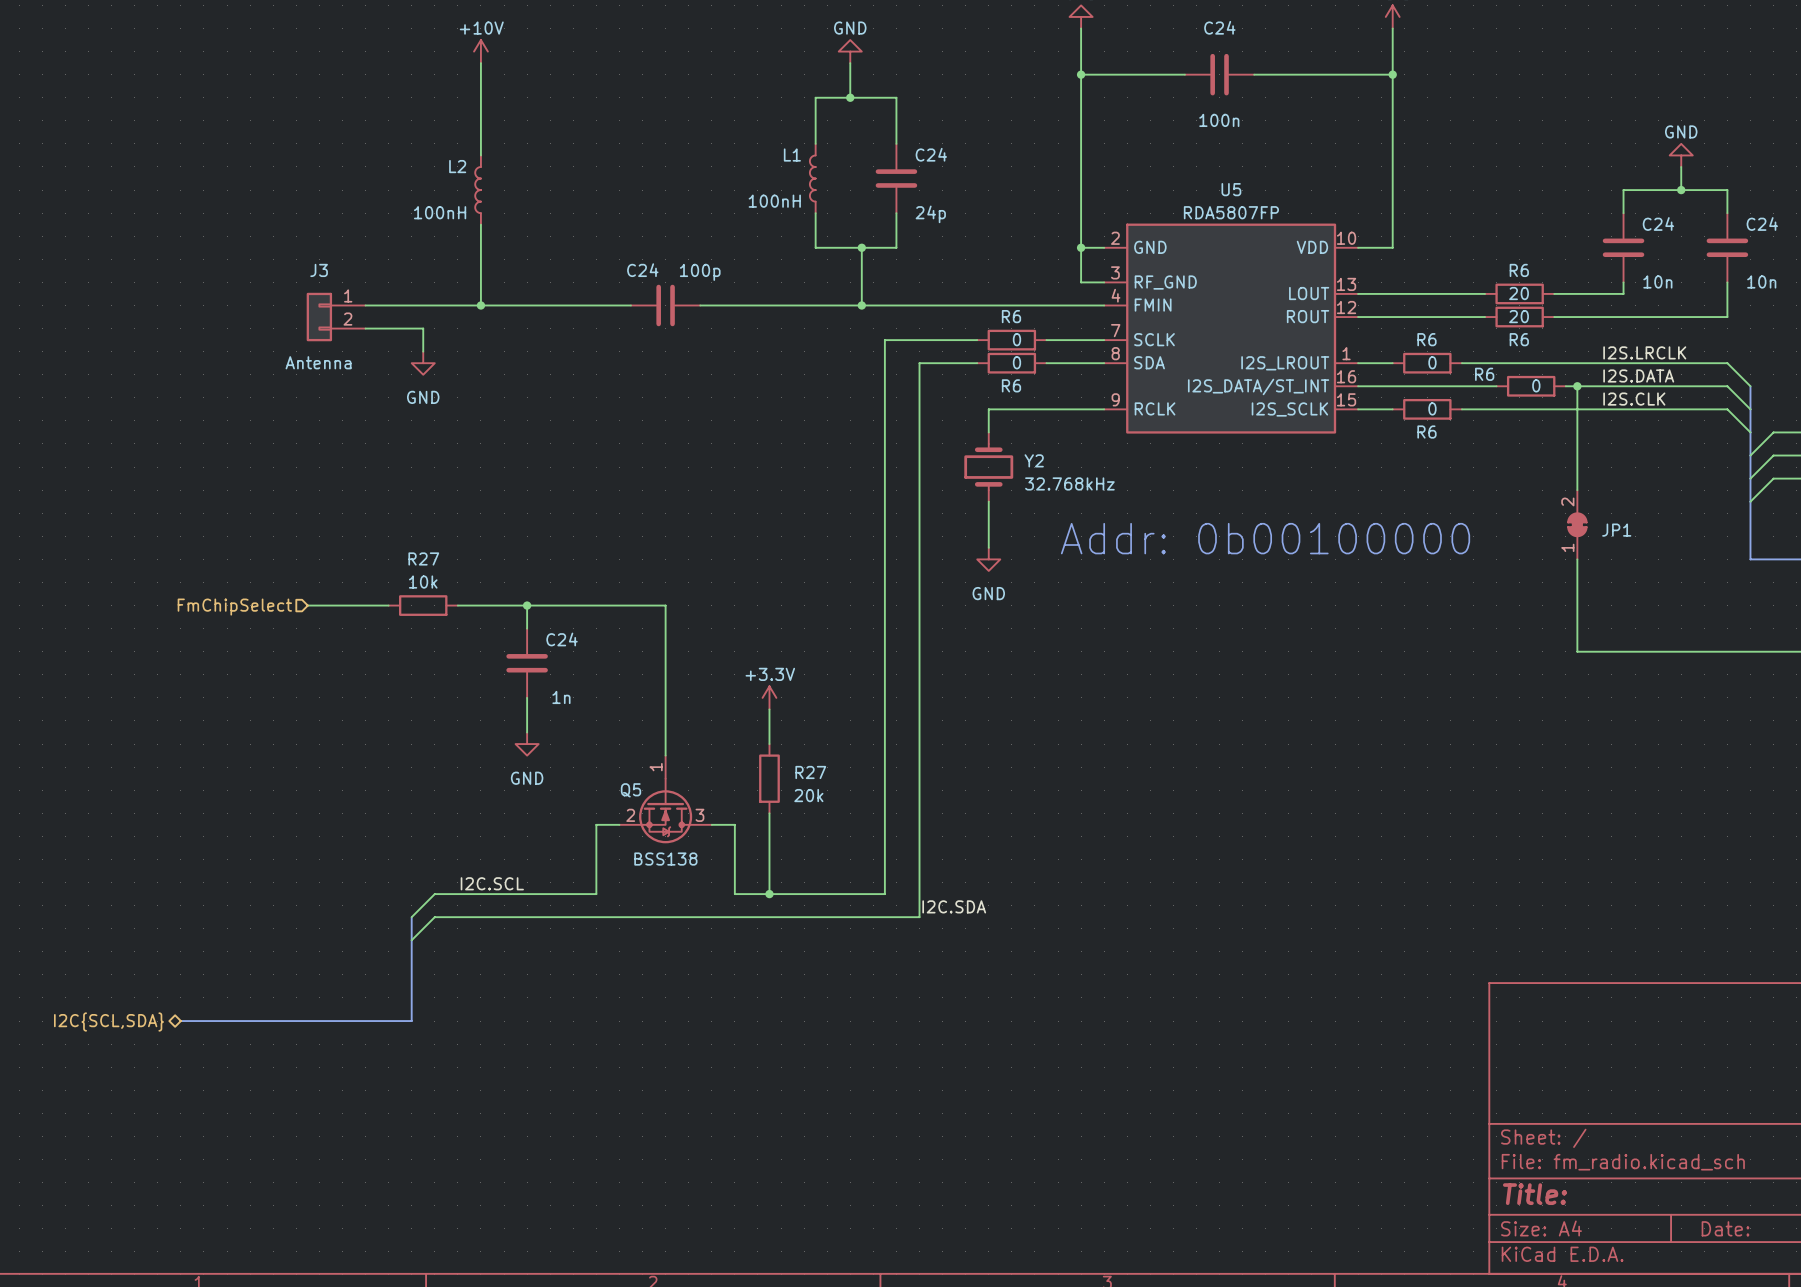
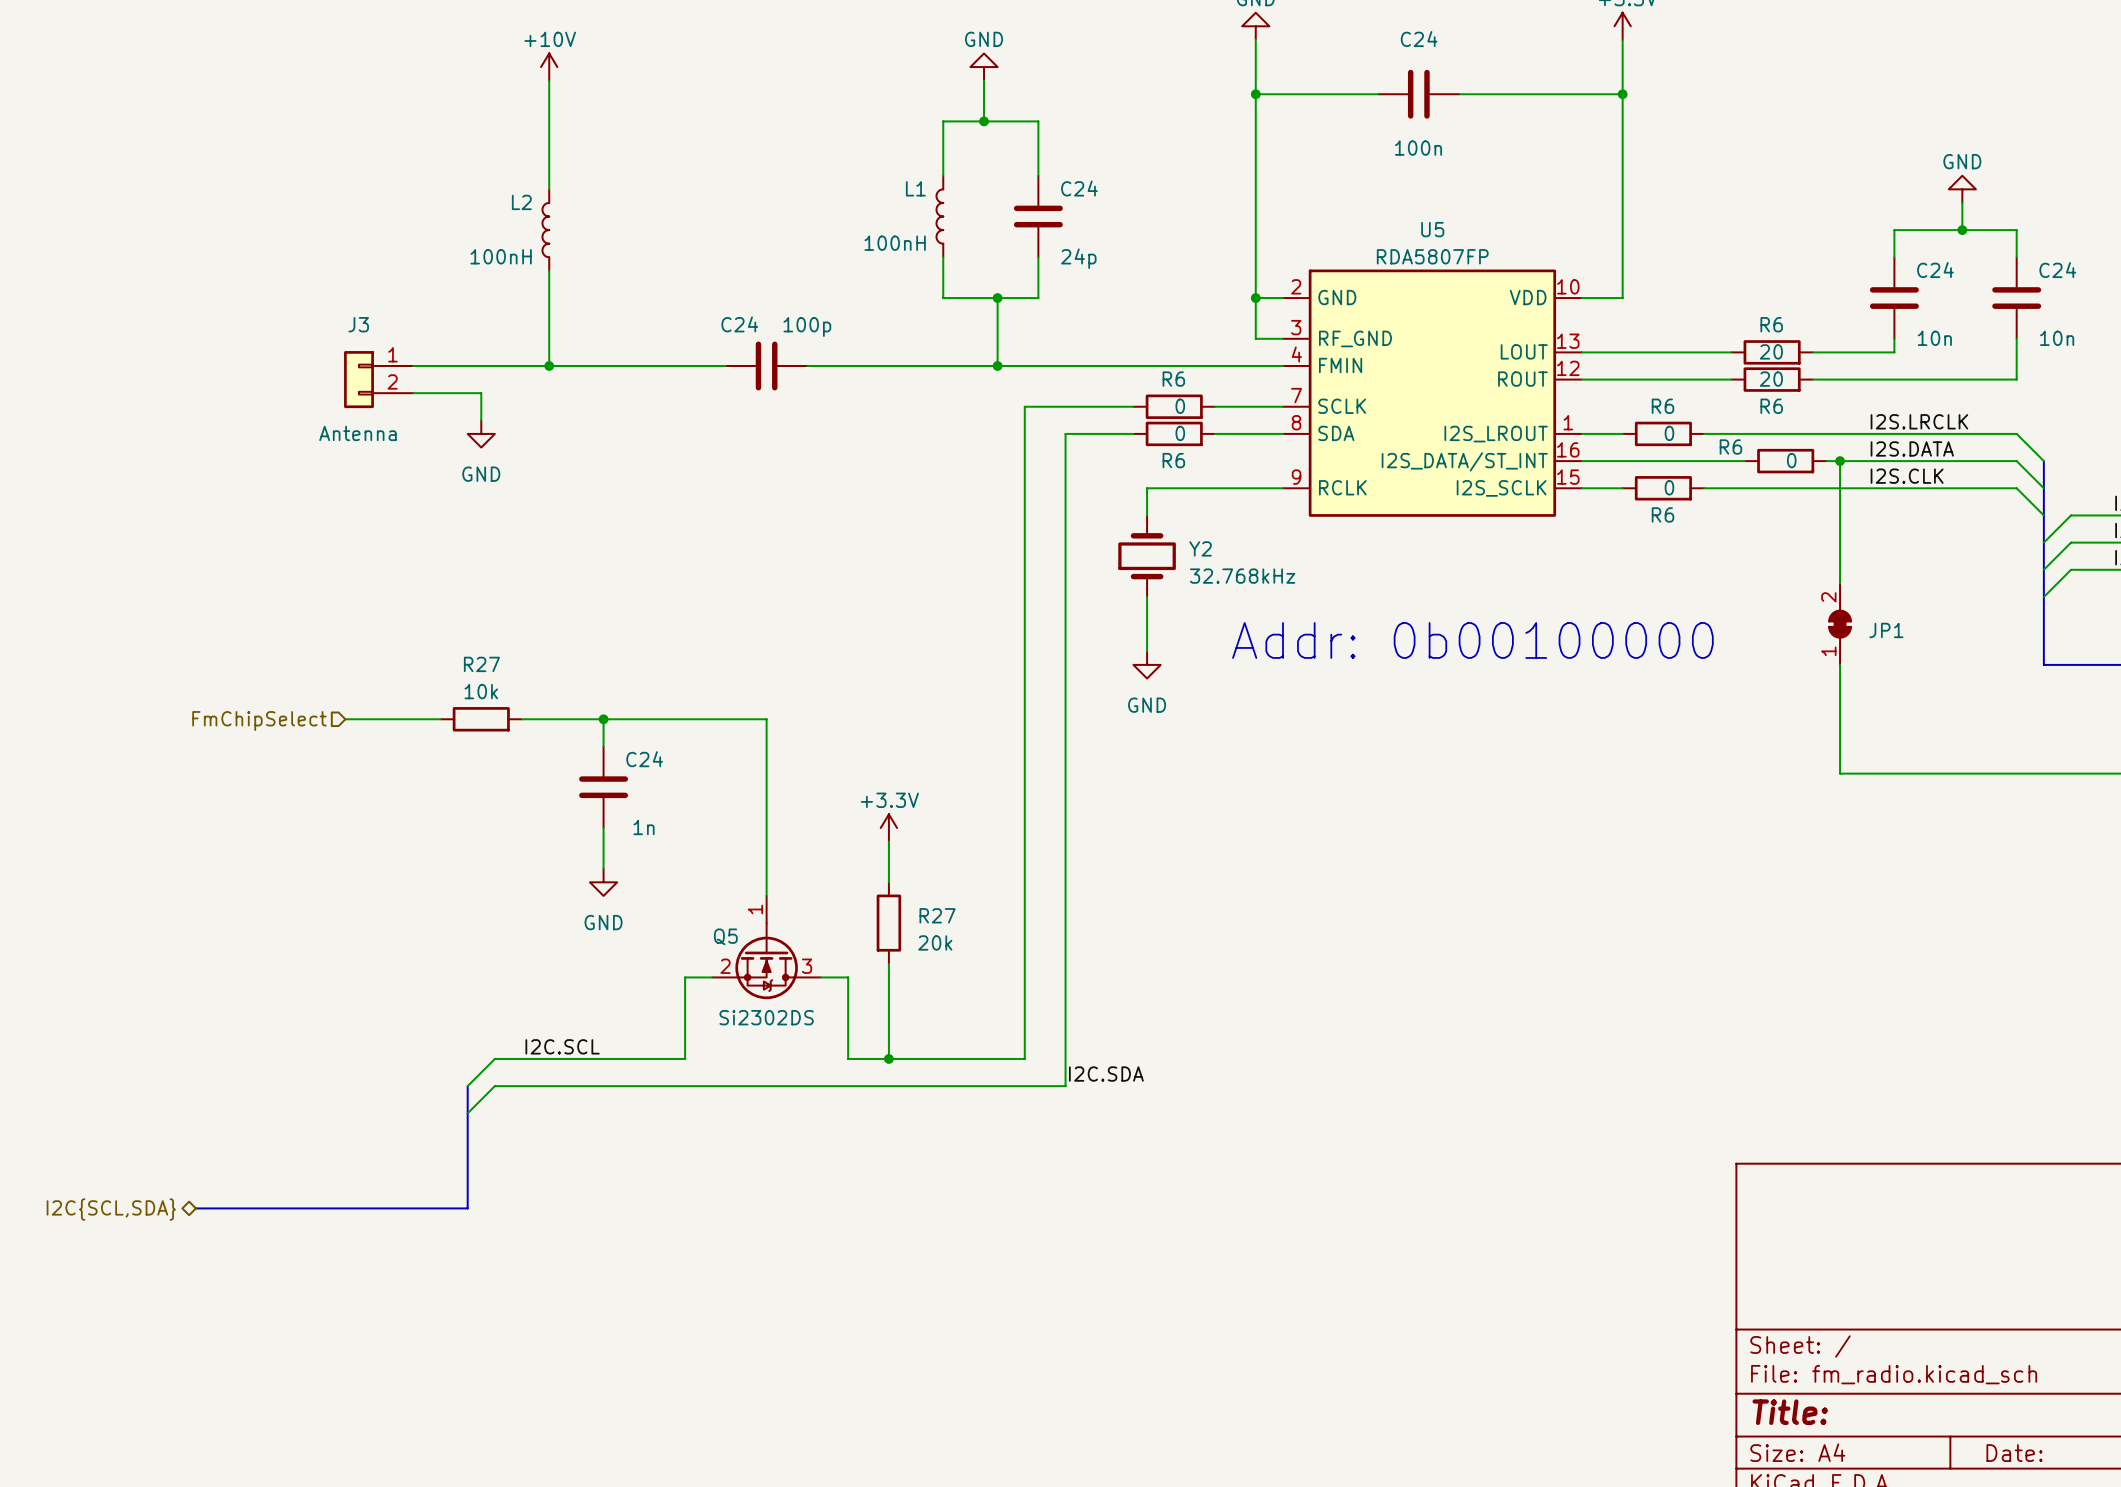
Q5 value: BSS138 (665, 859) -> Si2302DS (766, 1017)

